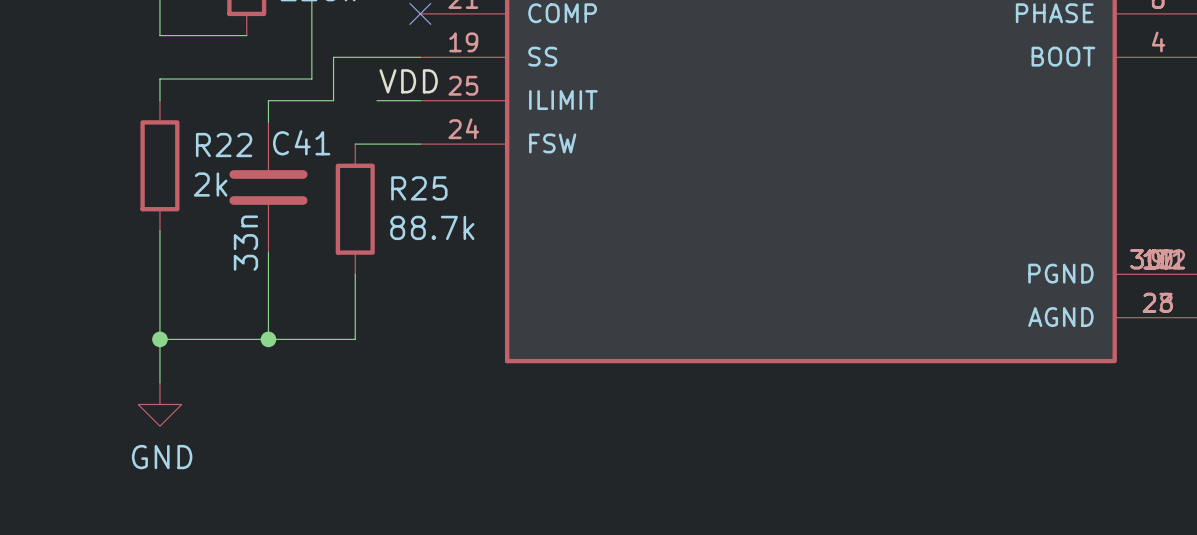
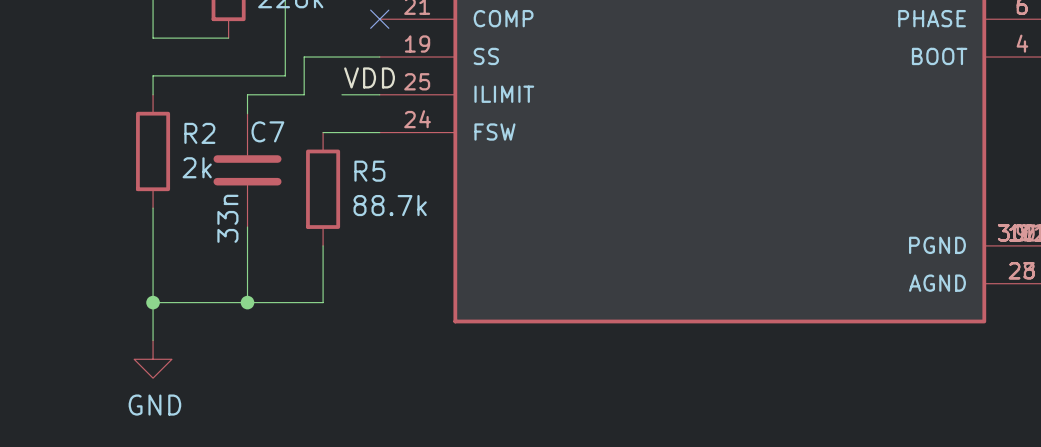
C41 name: C41 (301, 142) -> C7 (267, 131)
R22 name: R22 (224, 145) -> R2 (199, 133)
R25 name: R25 (419, 188) -> R5 (369, 171)

